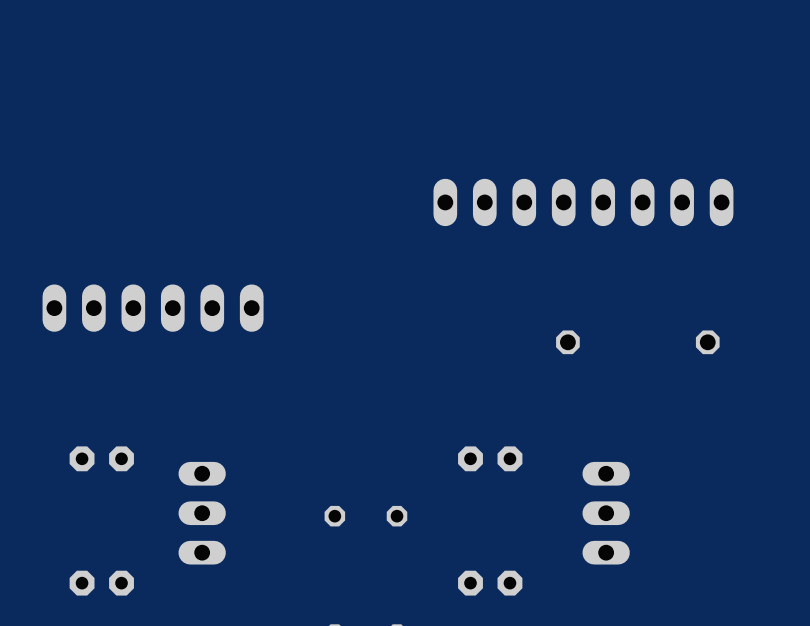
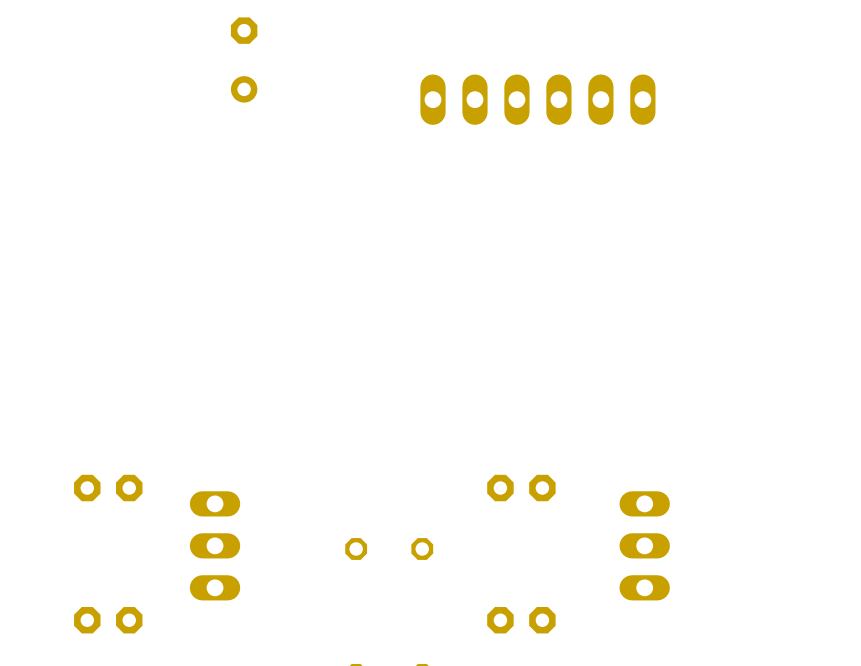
part: none -> (244, 59)
part: none -> (537, 99)
part: (583, 202) -> none
part: (153, 308) -> none
part: (567, 342) -> none
part: (707, 342) -> none

